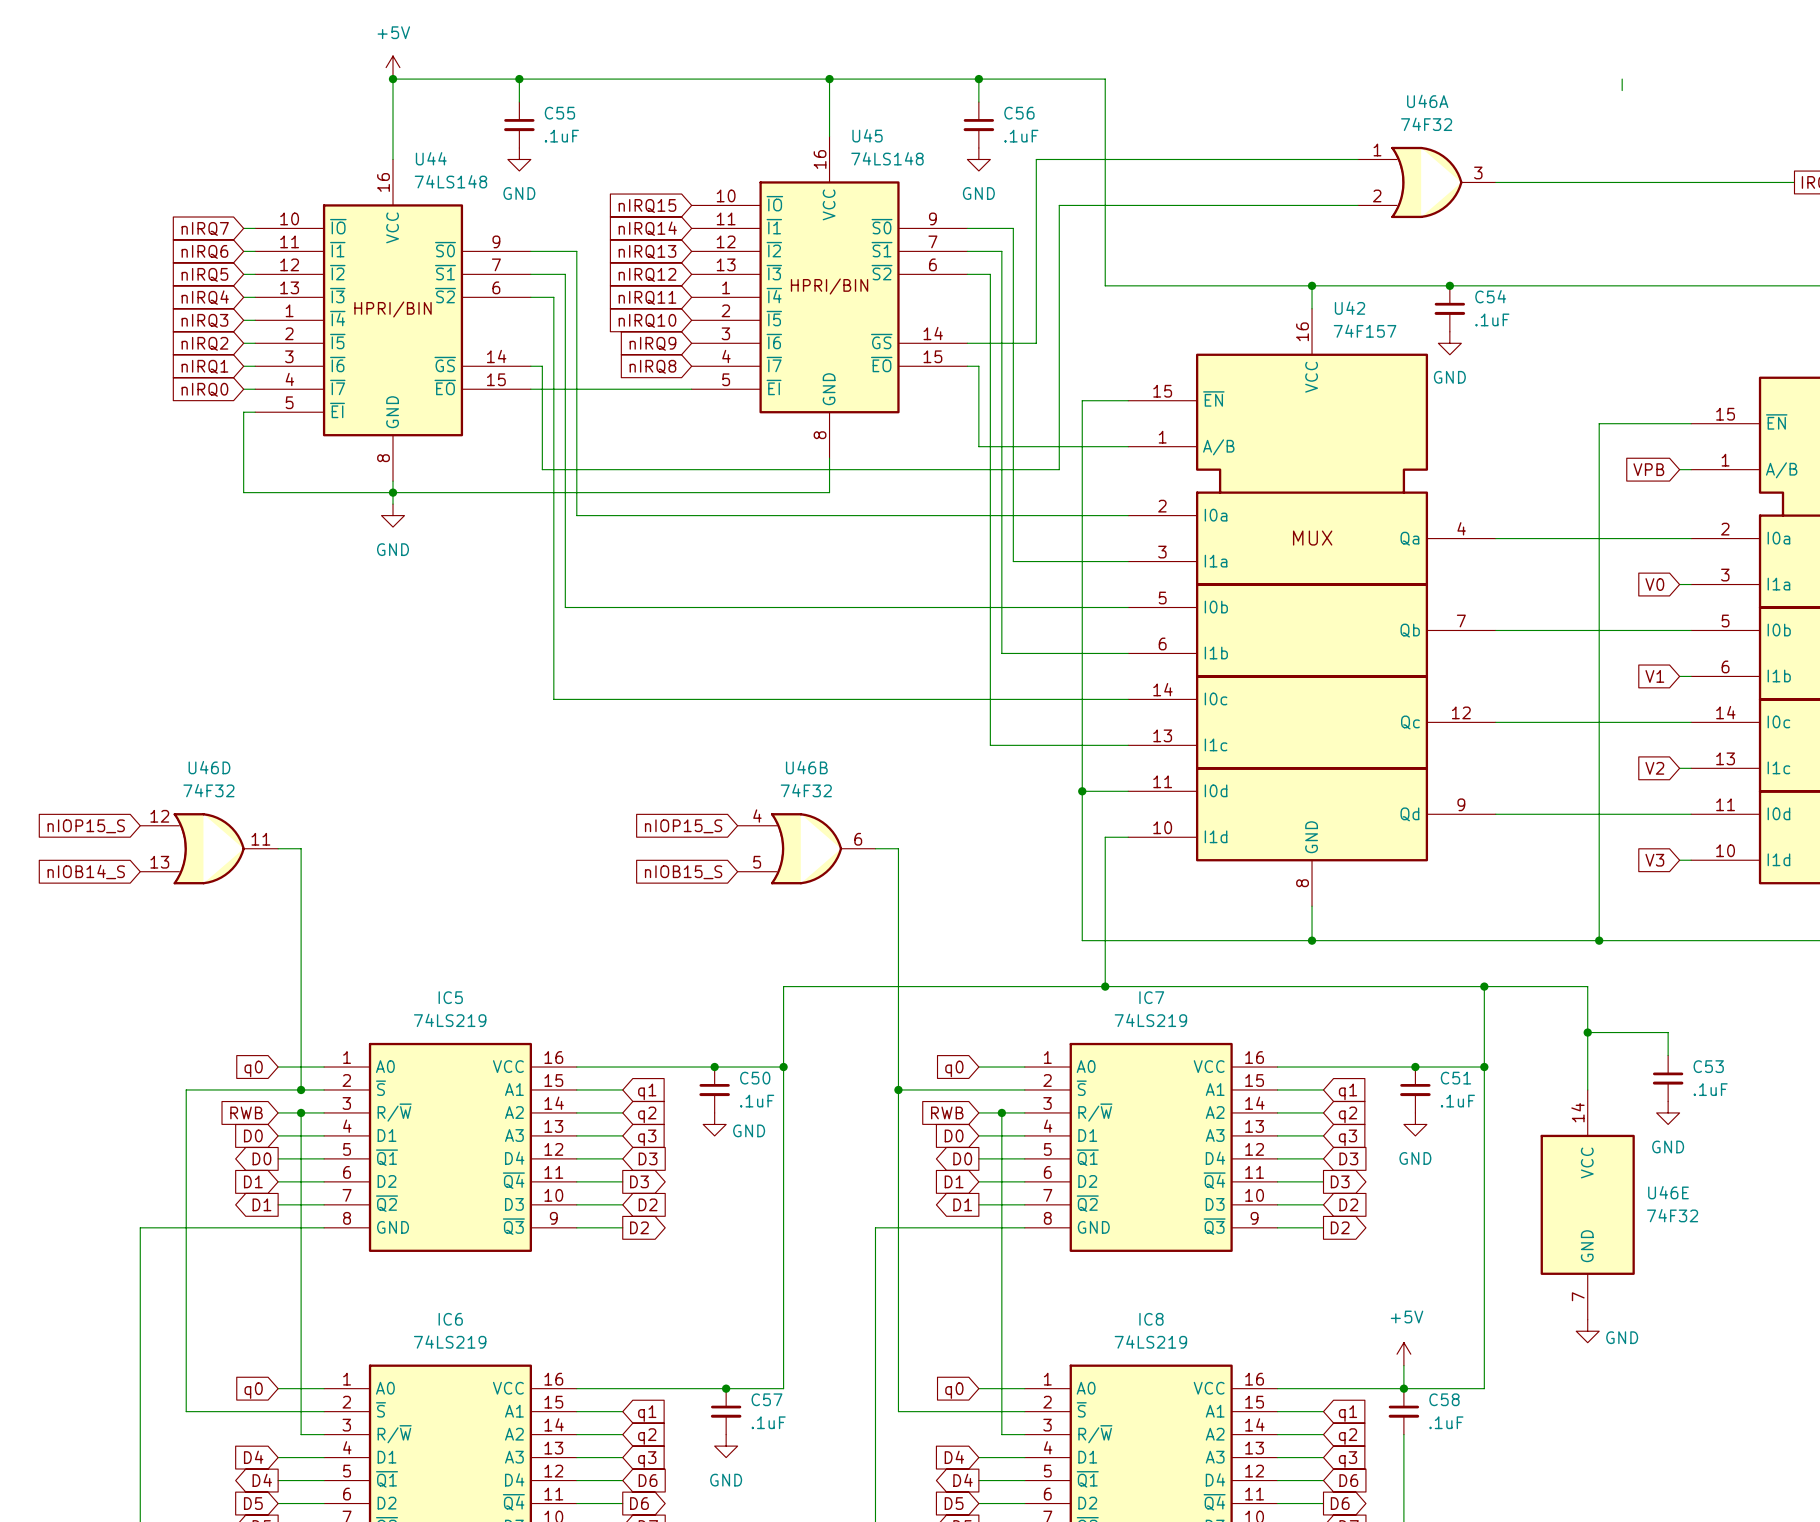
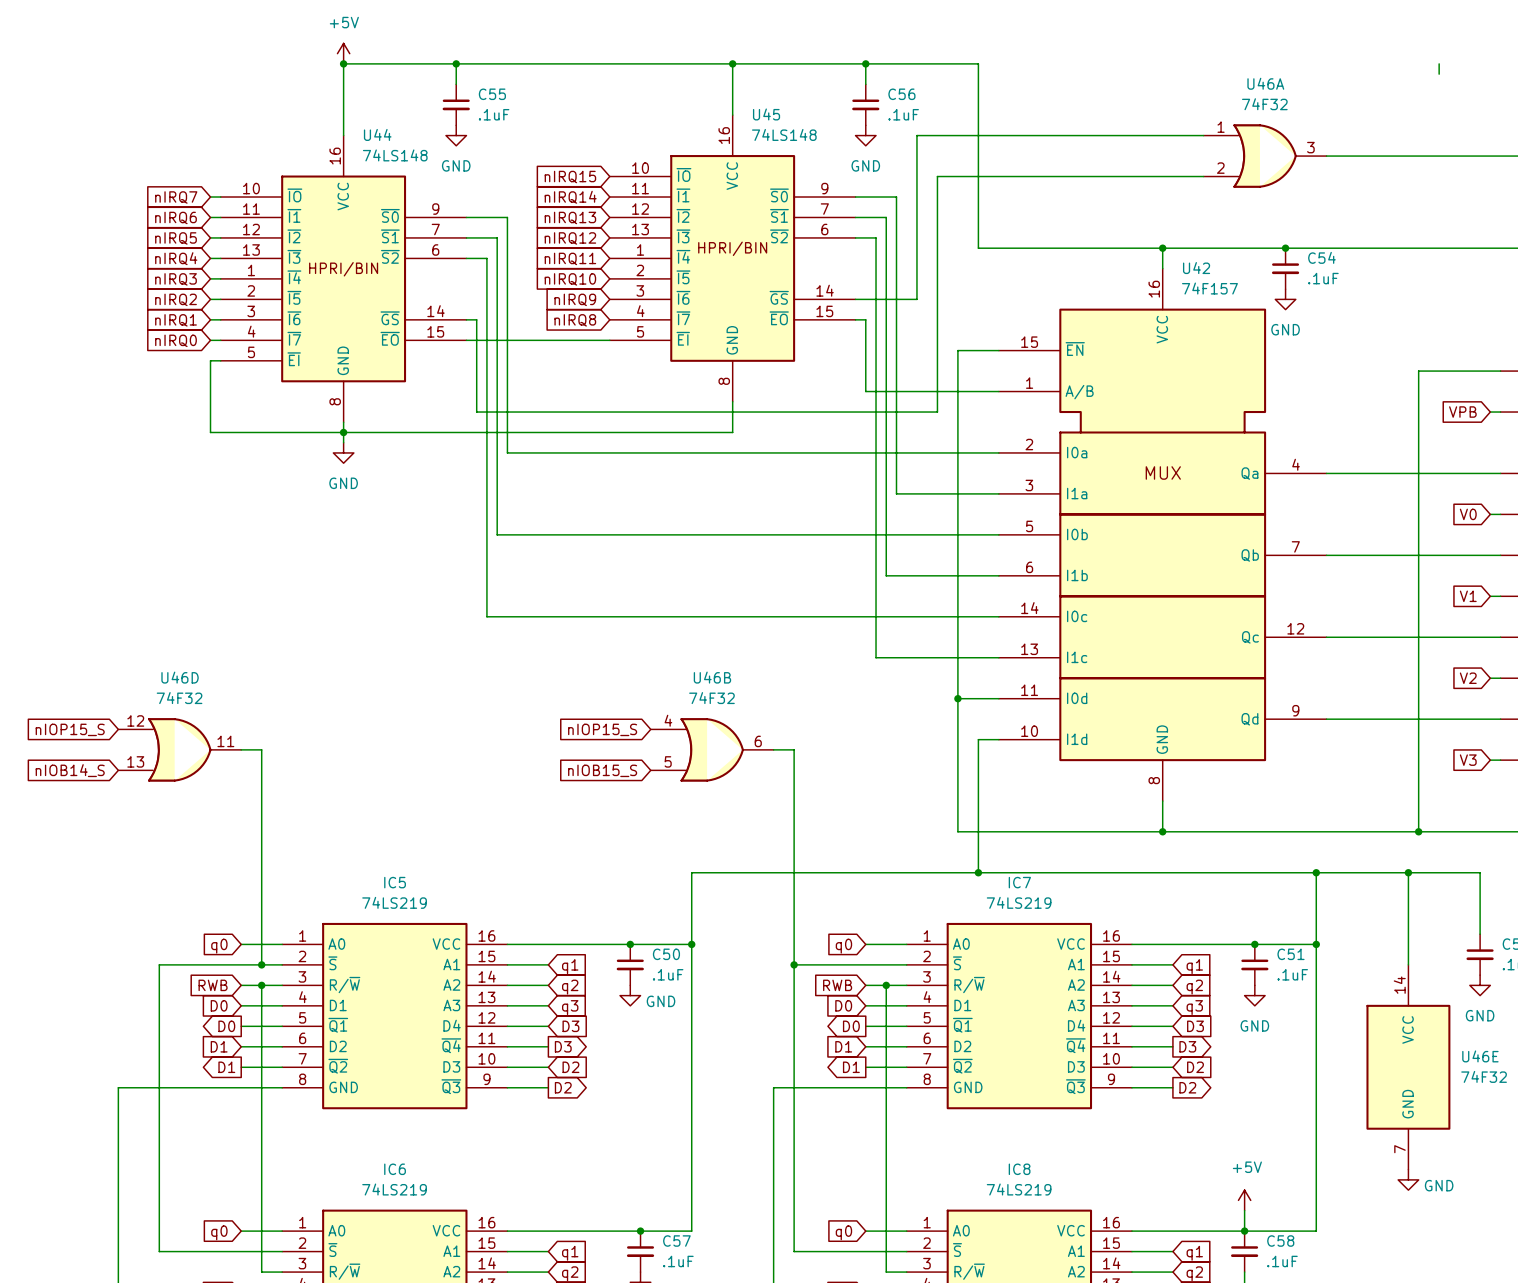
wire: (1587, 1032) (1668, 1032) -> (1408, 872) (1480, 872) (1480, 913)
junction position: (1587, 1032) -> (1408, 872)

